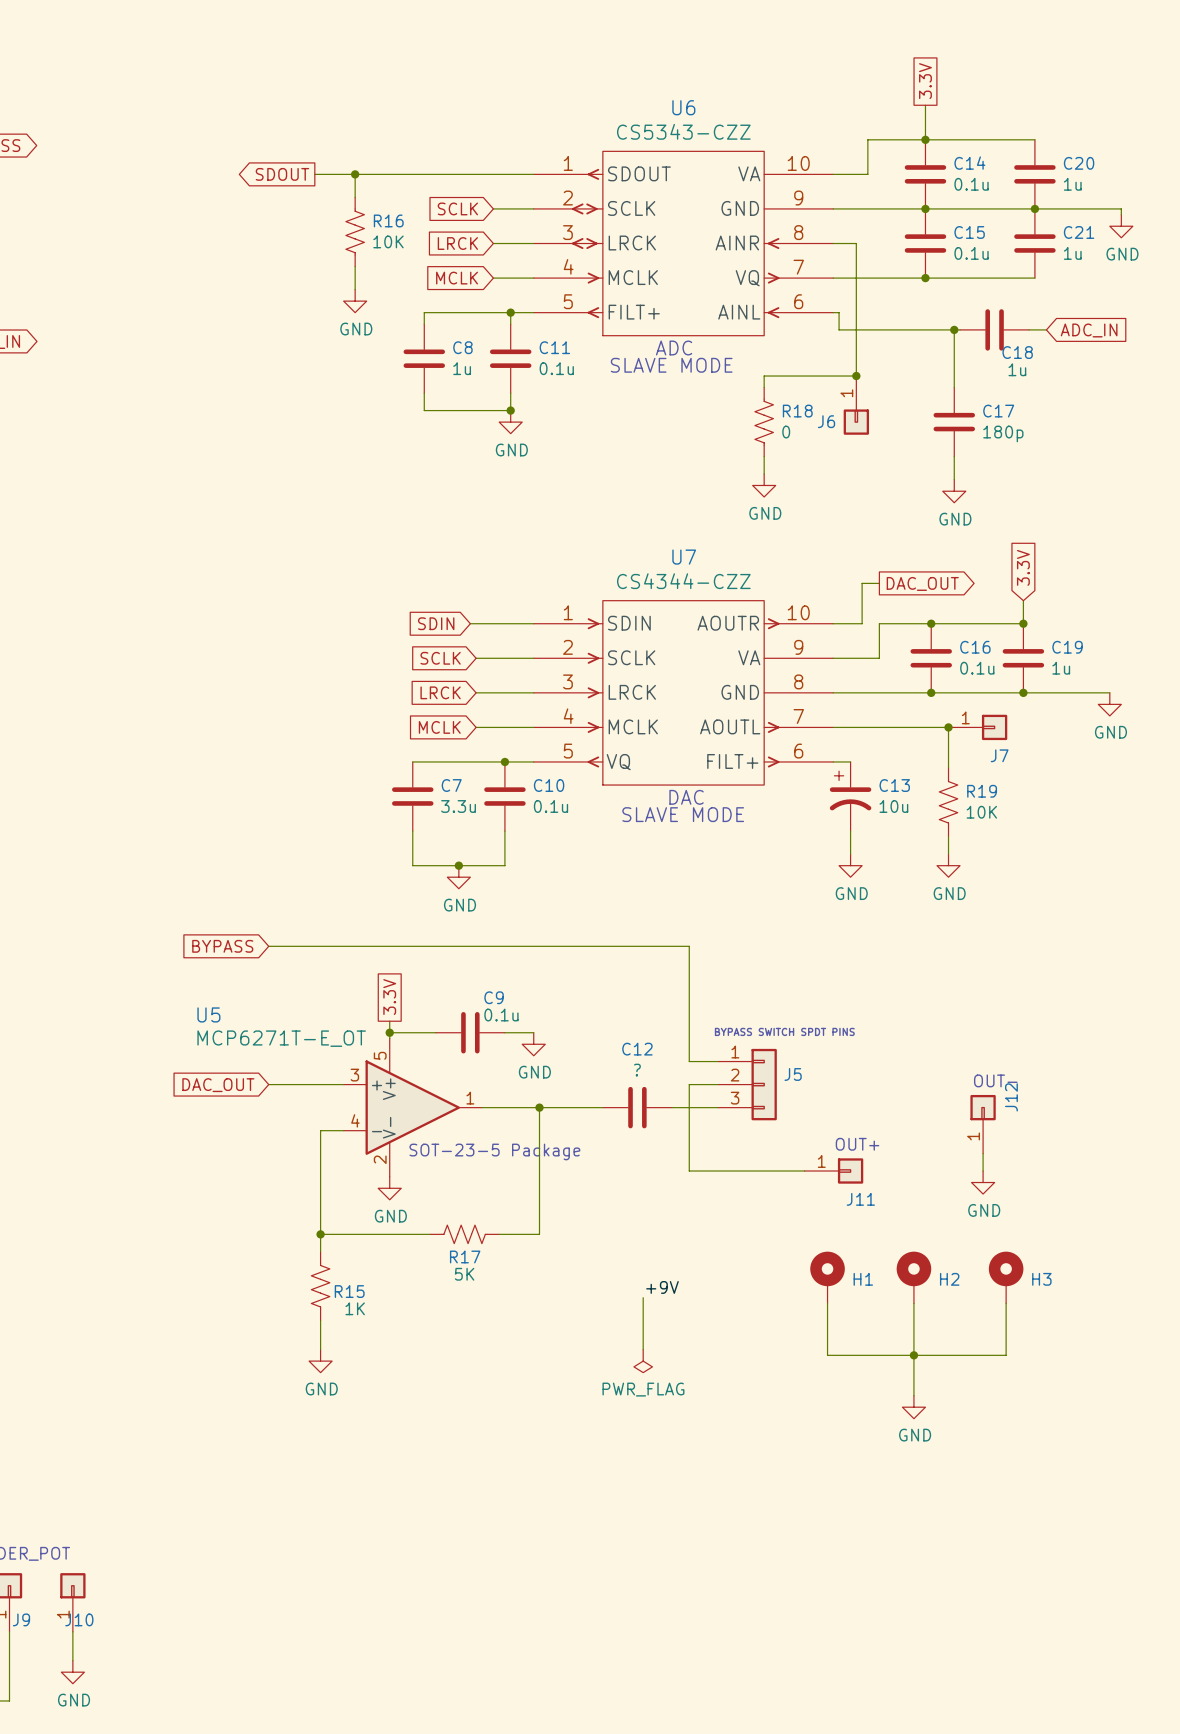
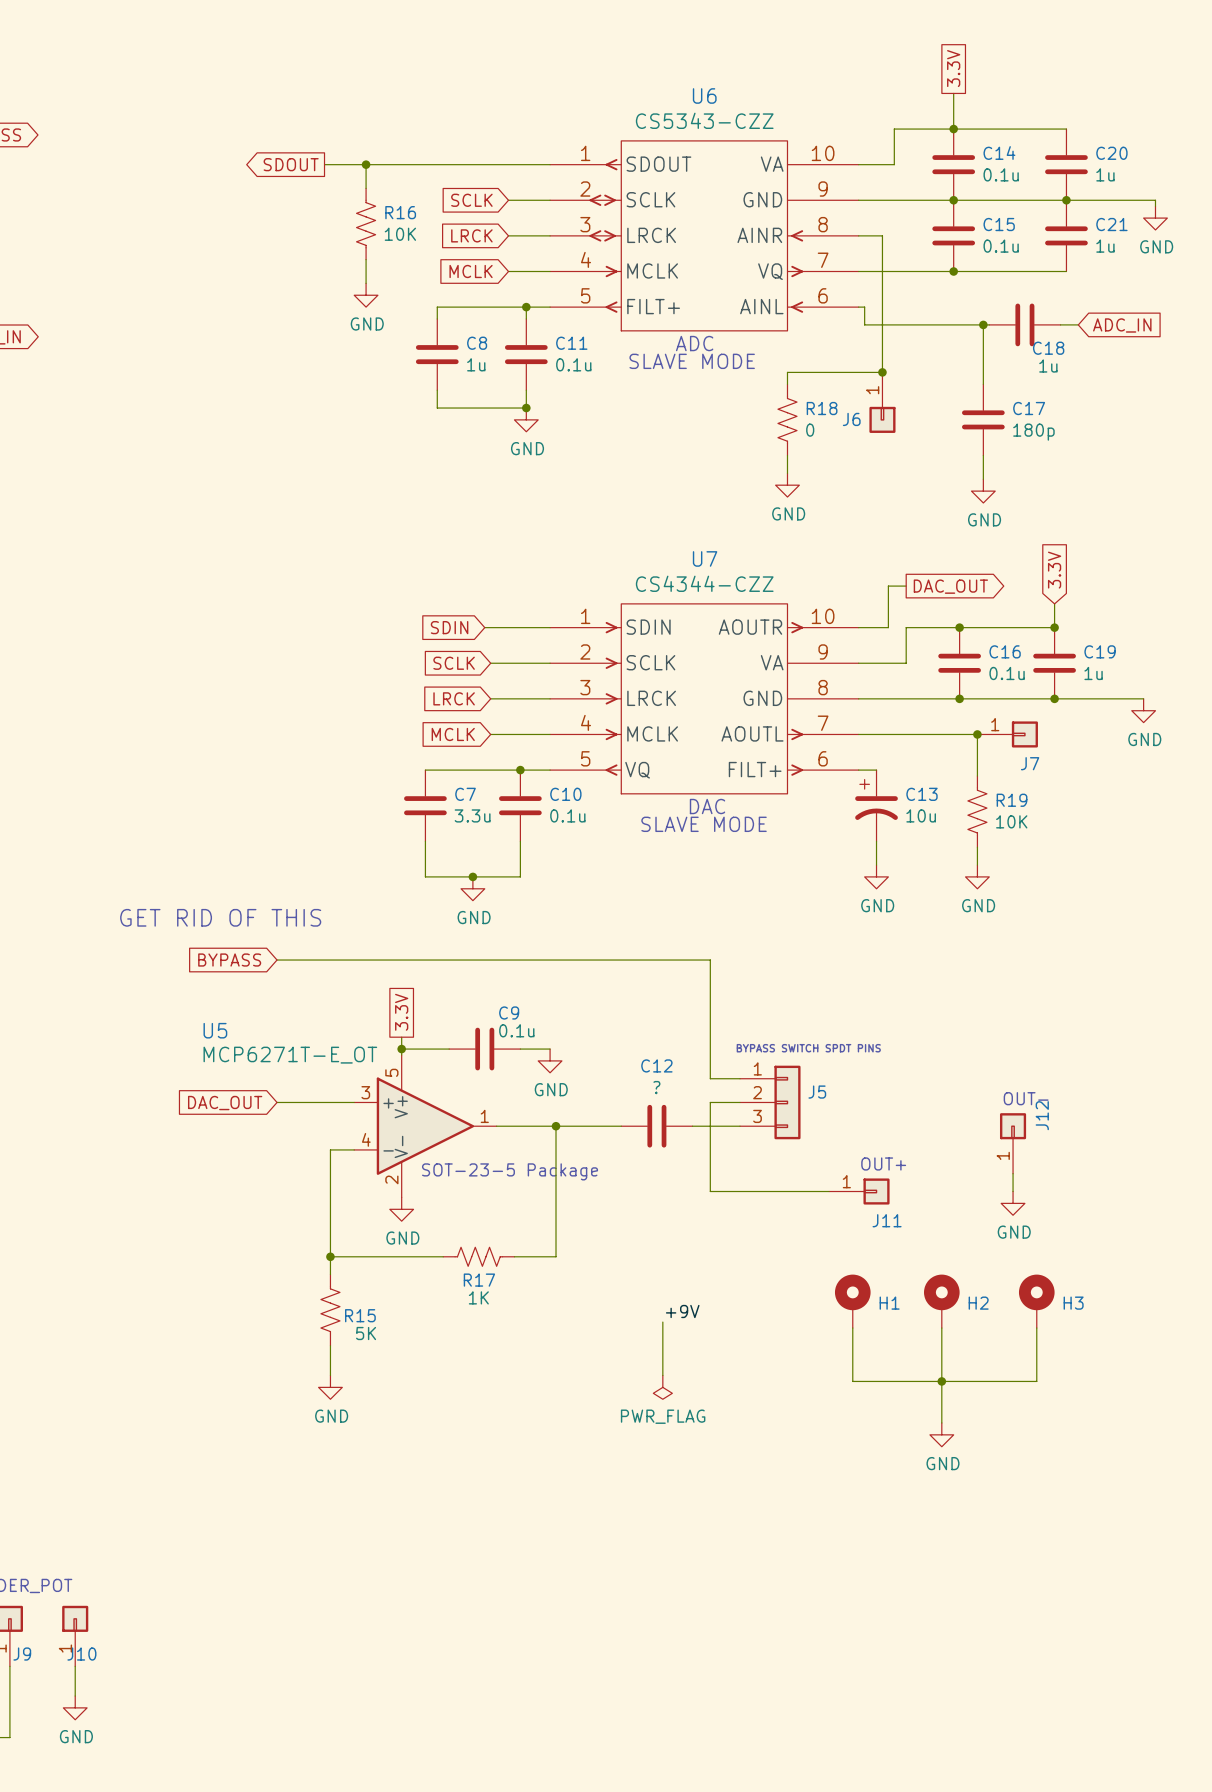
text: none -> GET RID OF THIS (220, 917)
R17 value: 5K (464, 1274) -> 1K (478, 1297)
R15 value: 1K (355, 1308) -> 5K (366, 1333)

